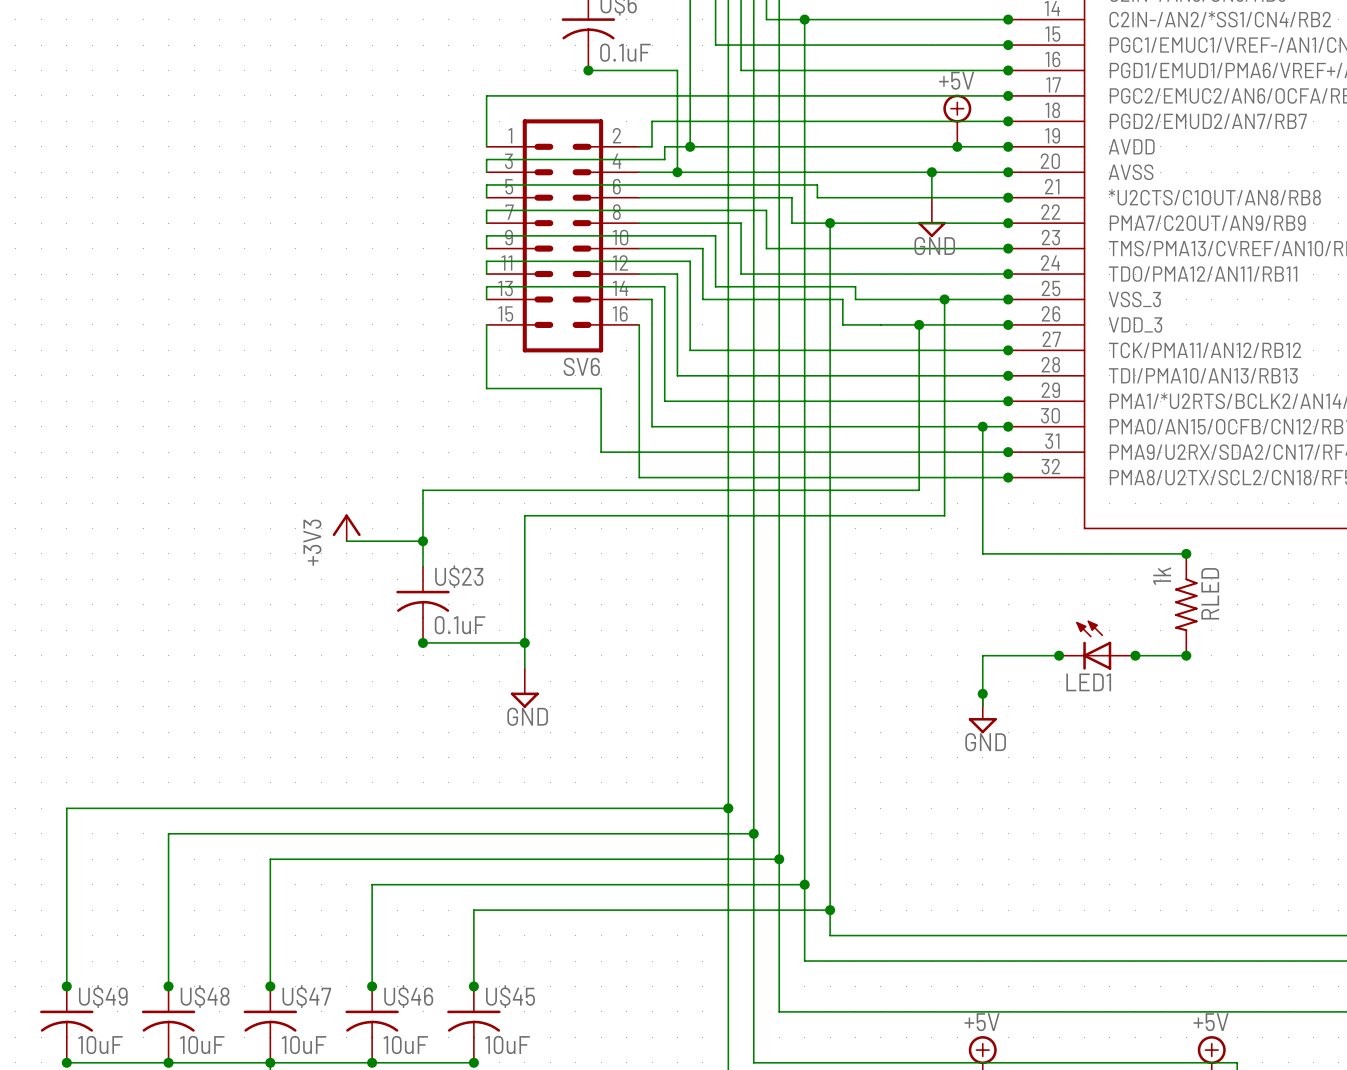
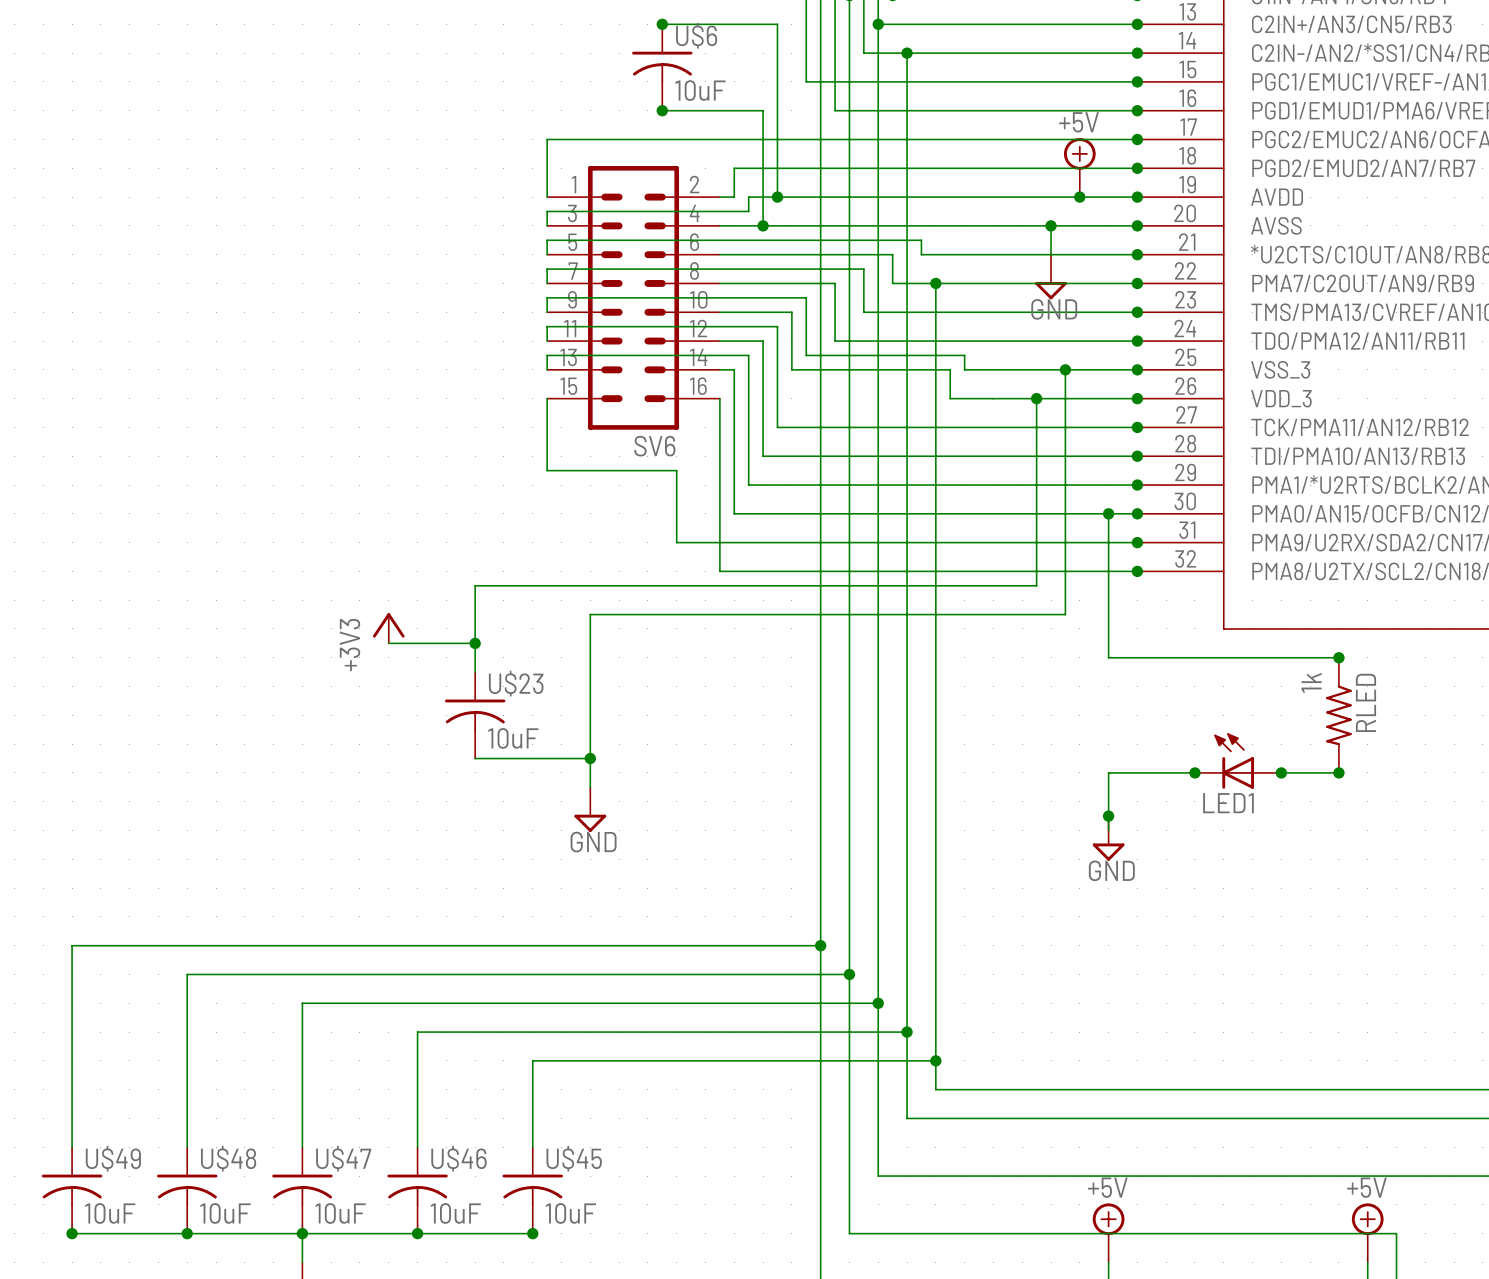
U$6 value: 0.1uF (625, 52) -> 10uF (700, 90)
U$23 value: 0.1uF (460, 625) -> 10uF (513, 738)
junction: (423, 642) -> none
junction: (66, 986) -> none
junction: (168, 986) -> none
junction: (270, 986) -> none
junction: (372, 986) -> none
junction: (473, 986) -> none

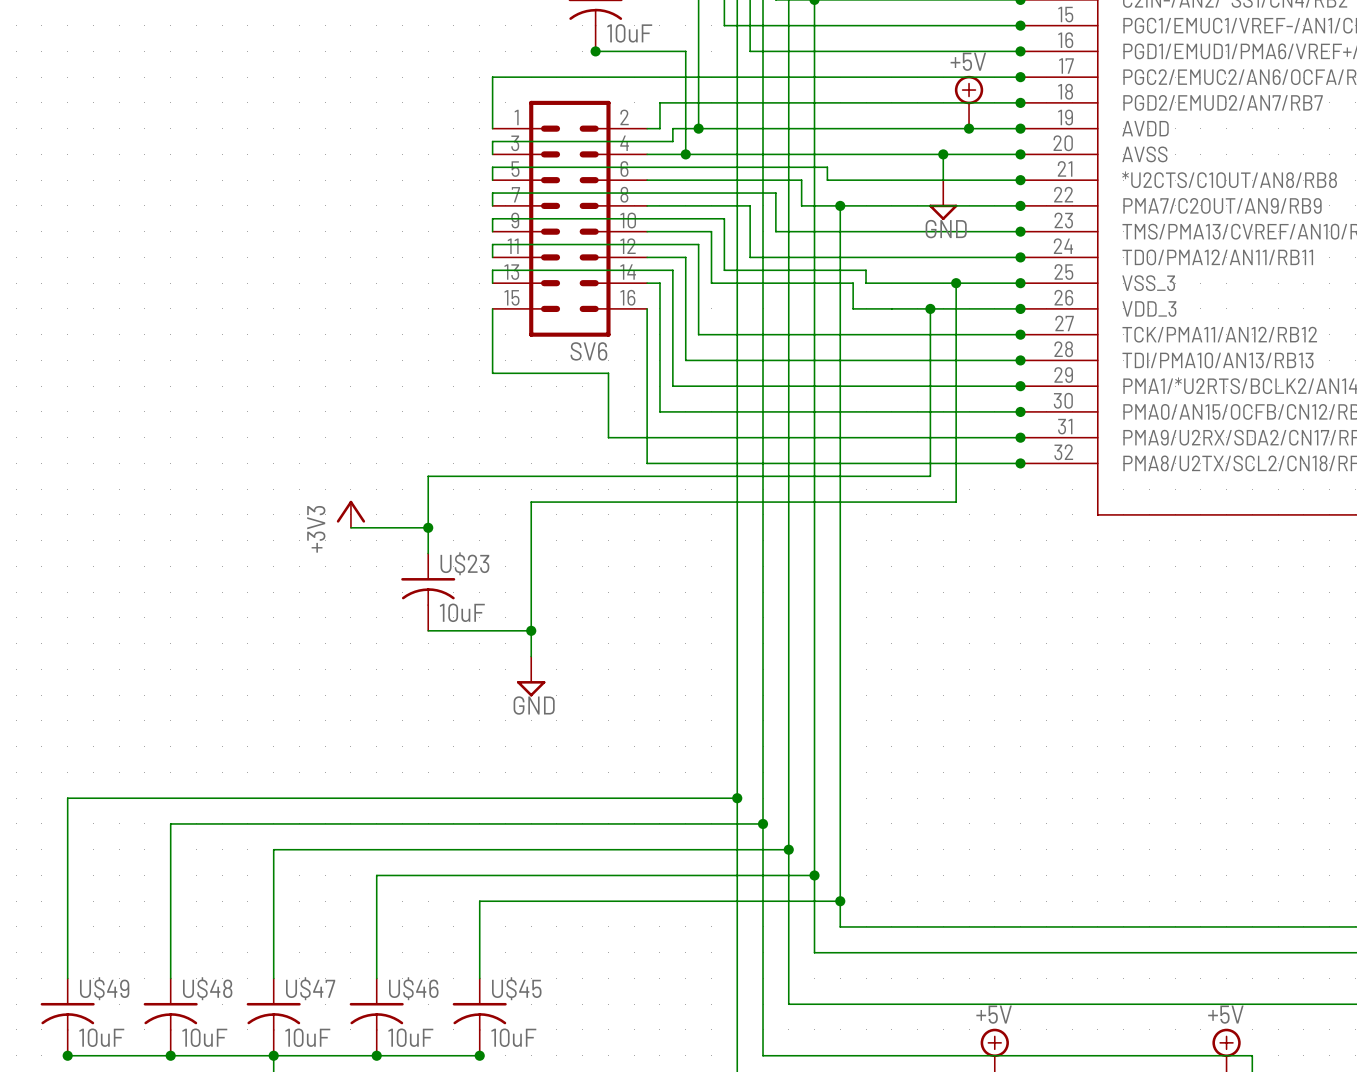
wire: (1108, 513) (1108, 657) (1338, 657) -> none
junction: (1108, 513) -> none
junction: (1338, 657) -> none
RLED: 1k (1338, 715) -> none
LED1: (1238, 760) -> none
wire: (1194, 772) (1108, 772) (1108, 830) -> none
junction: (1194, 772) -> none
wire: (1281, 772) (1338, 772) -> none
junction: (1281, 772) -> none
junction: (1338, 772) -> none
junction: (1108, 816) -> none
power symbol: GND (1108, 838) -> none

